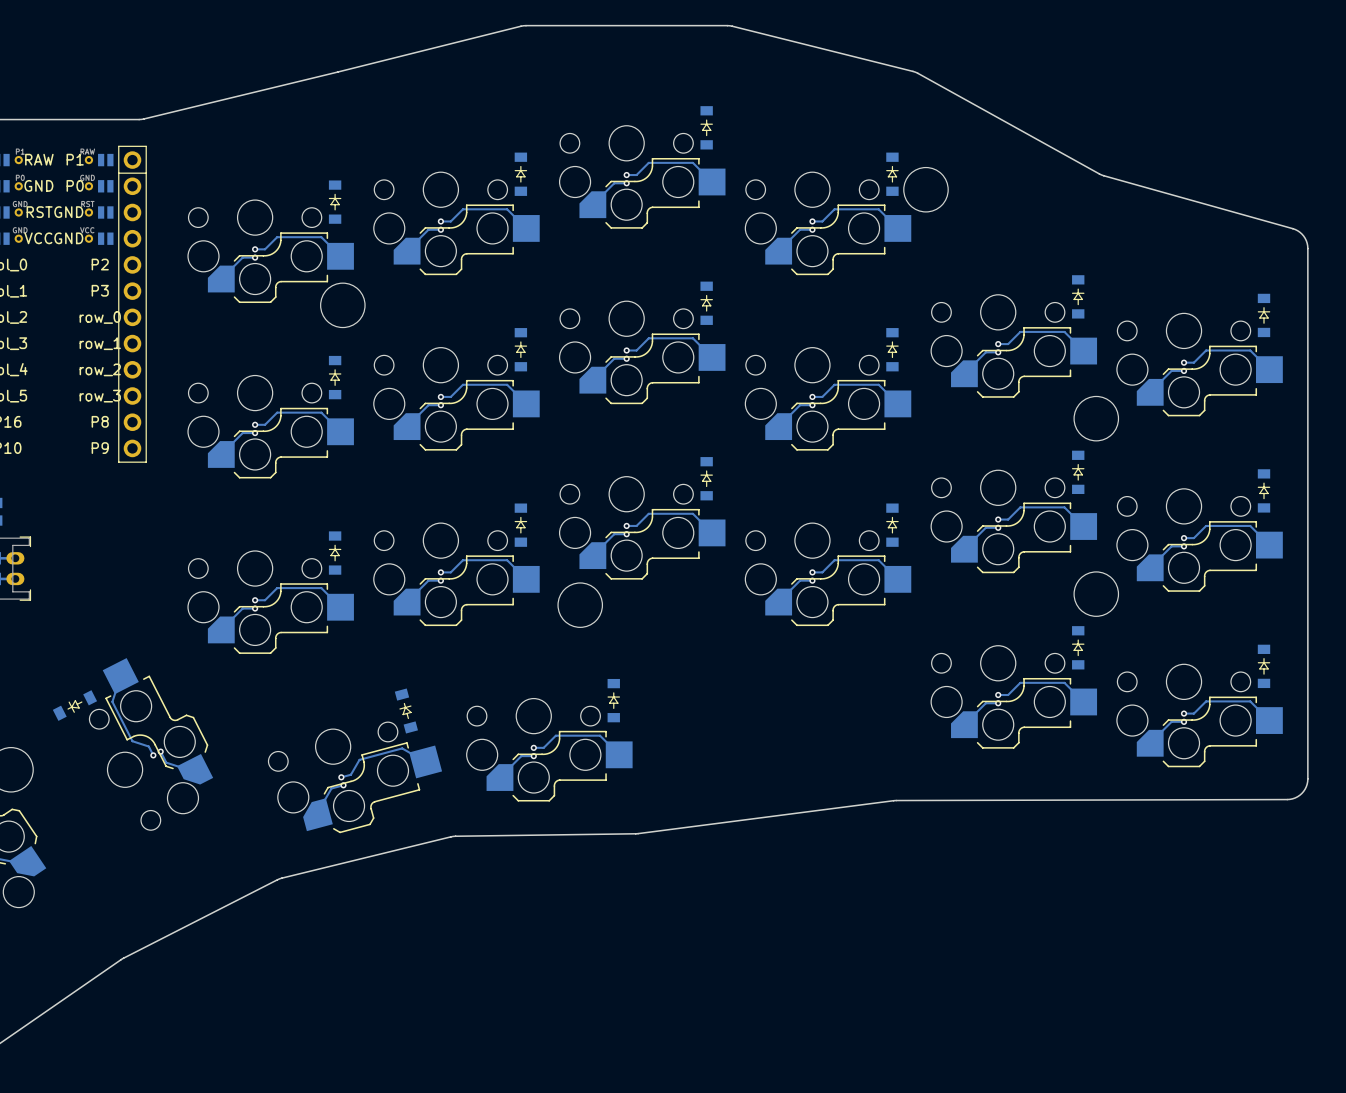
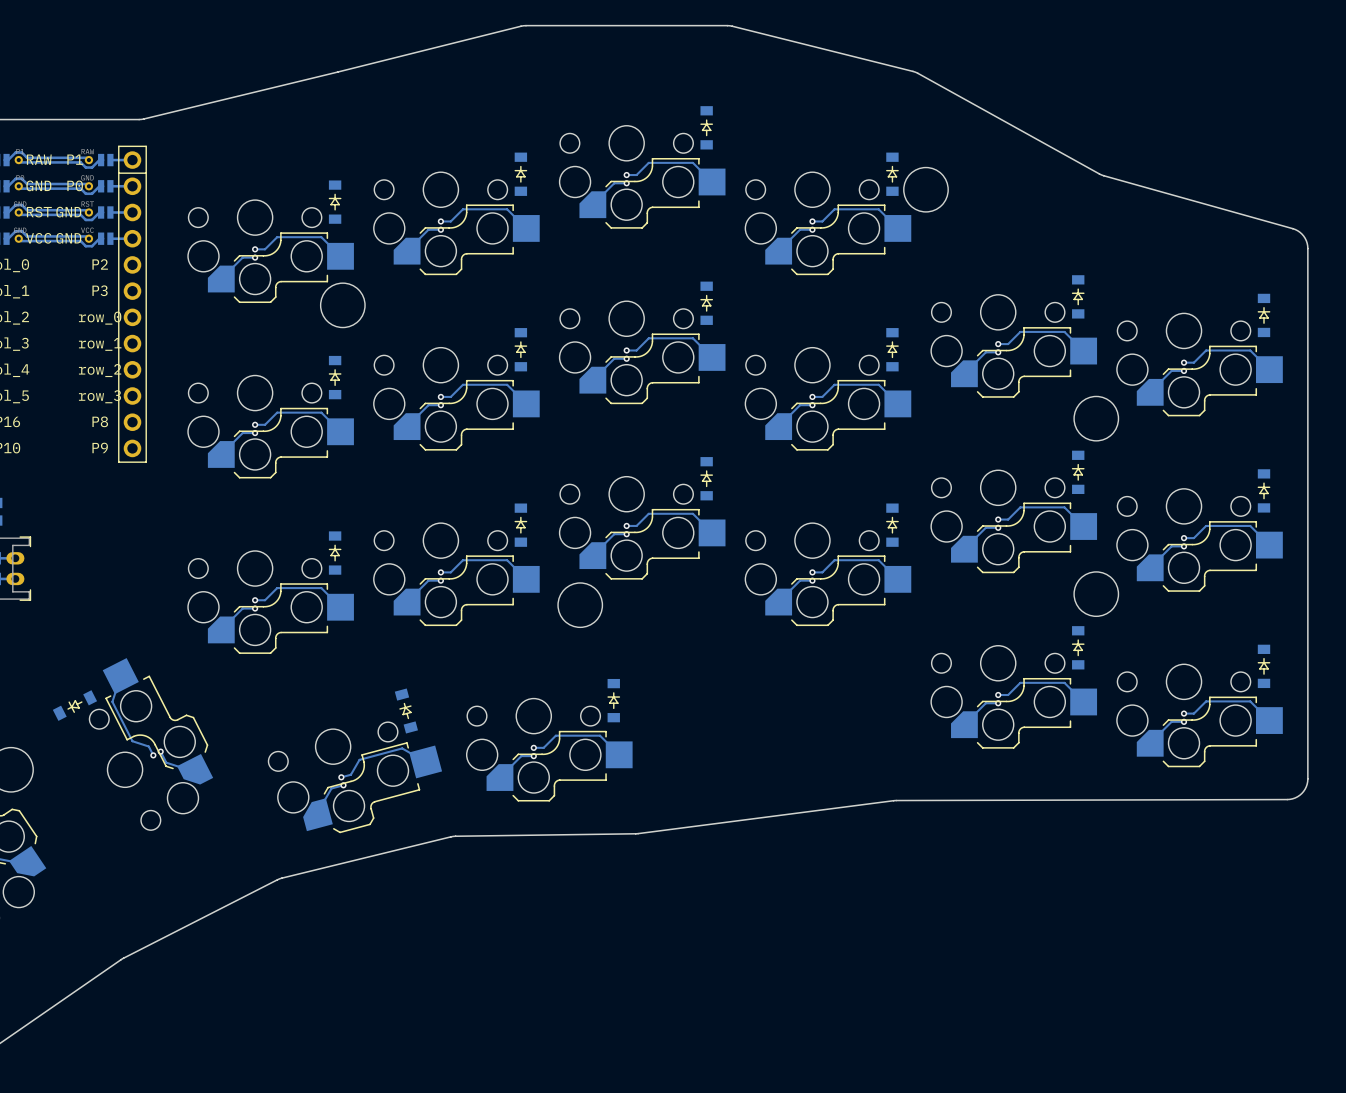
track: none -> (86, 157) (27, 157) (21, 152) (15, 152) (8, 160) (4, 160)
track: none -> (103, 160) (99, 160) (92, 167) (85, 167) (80, 162) (21, 162)
track: none -> (132, 160) (110, 160)
track: none -> (86, 184) (27, 184) (21, 178) (15, 178) (8, 186) (4, 186)
track: none -> (103, 186) (99, 186) (92, 193) (85, 193) (80, 188) (21, 188)
track: none -> (132, 186) (110, 186)
track: none -> (86, 210) (27, 210) (21, 205) (15, 205) (8, 212) (4, 212)
track: none -> (103, 212) (99, 212) (92, 219) (85, 219) (80, 214) (21, 214)
track: none -> (132, 212) (110, 212)
track: none -> (86, 236) (27, 236) (21, 231) (15, 231) (8, 238) (4, 238)
track: none -> (103, 238) (99, 238) (92, 246) (85, 246) (80, 241) (21, 241)
track: none -> (132, 238) (110, 238)

